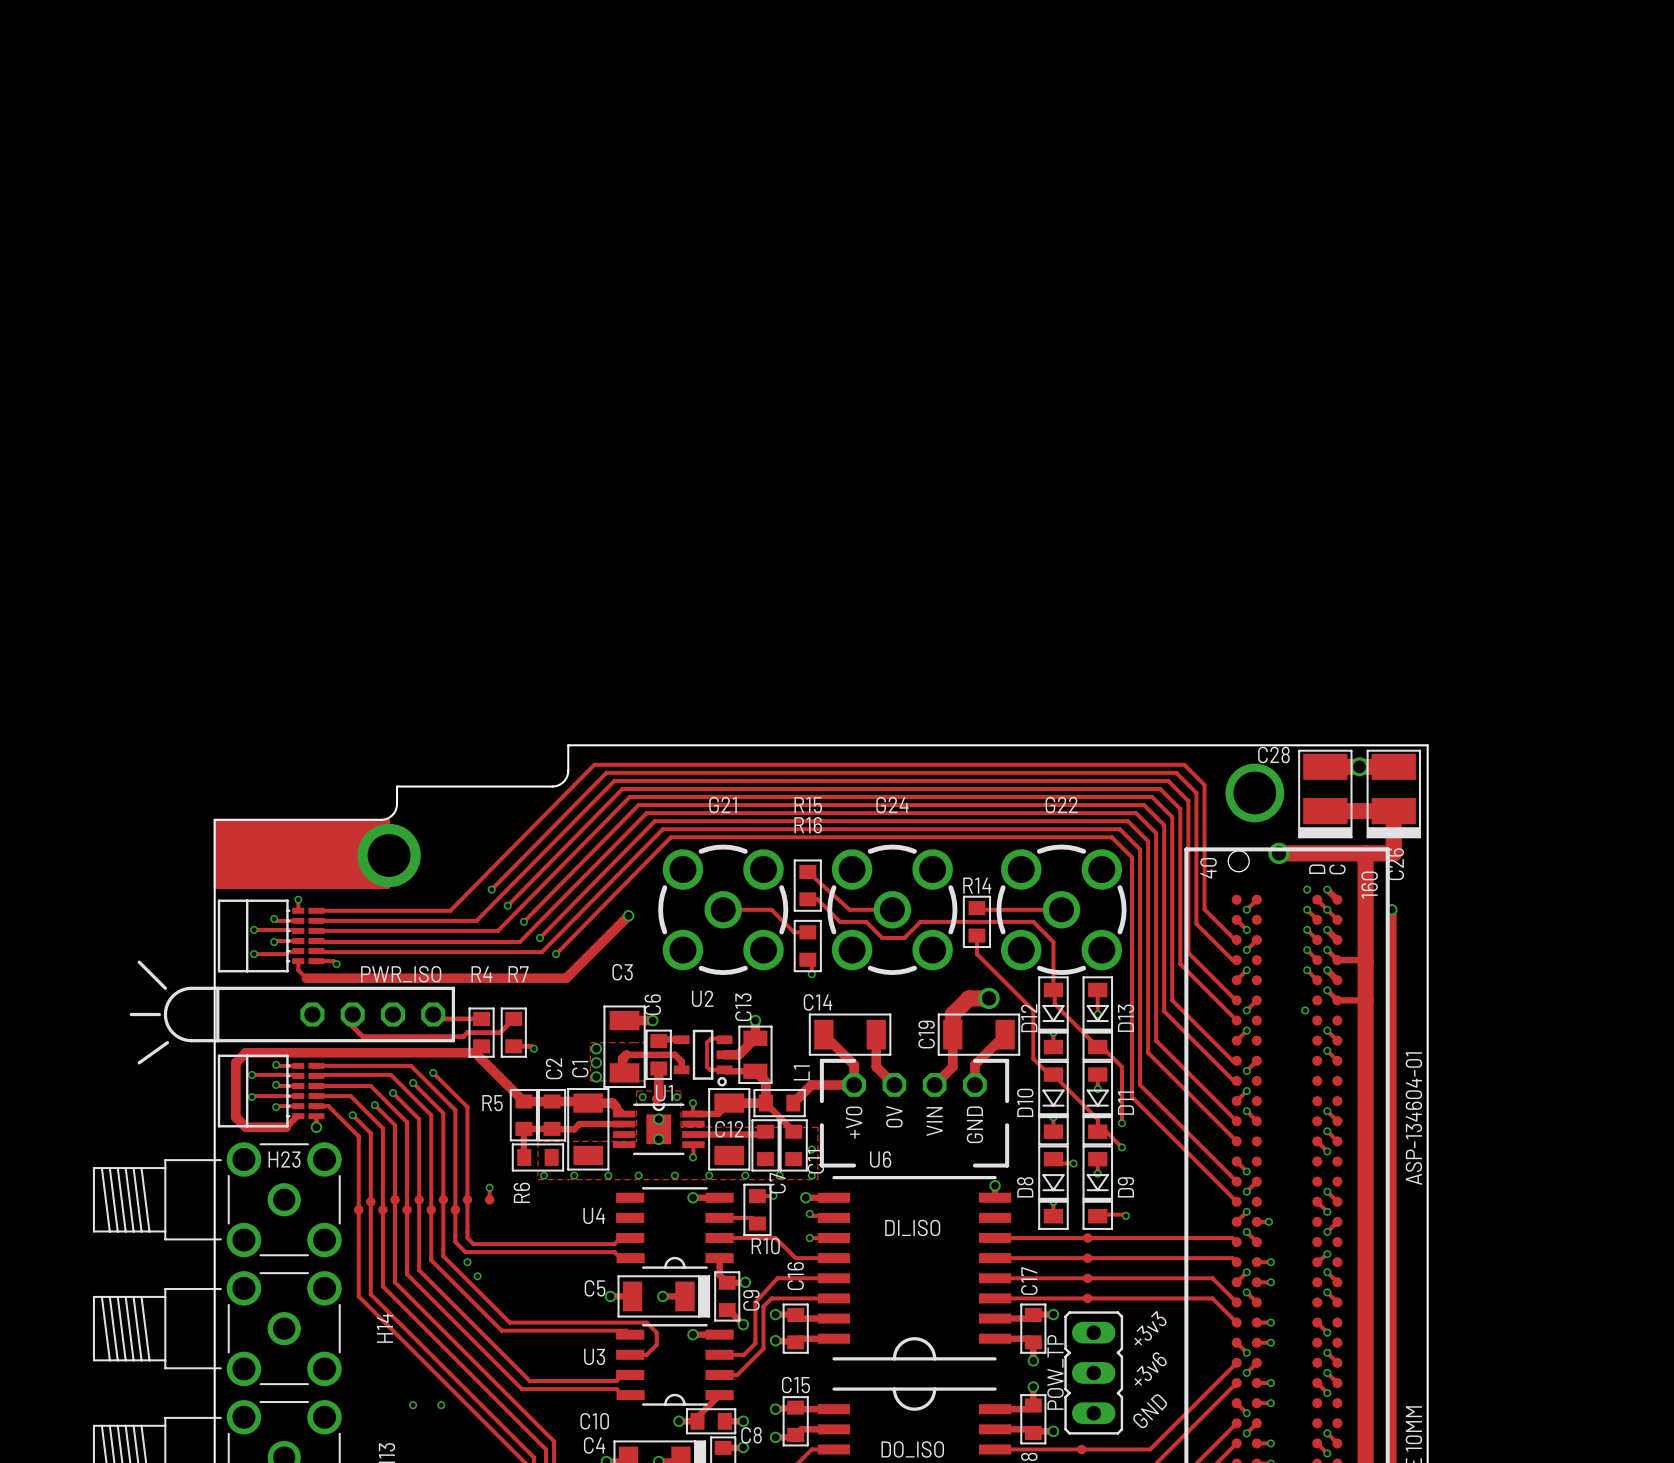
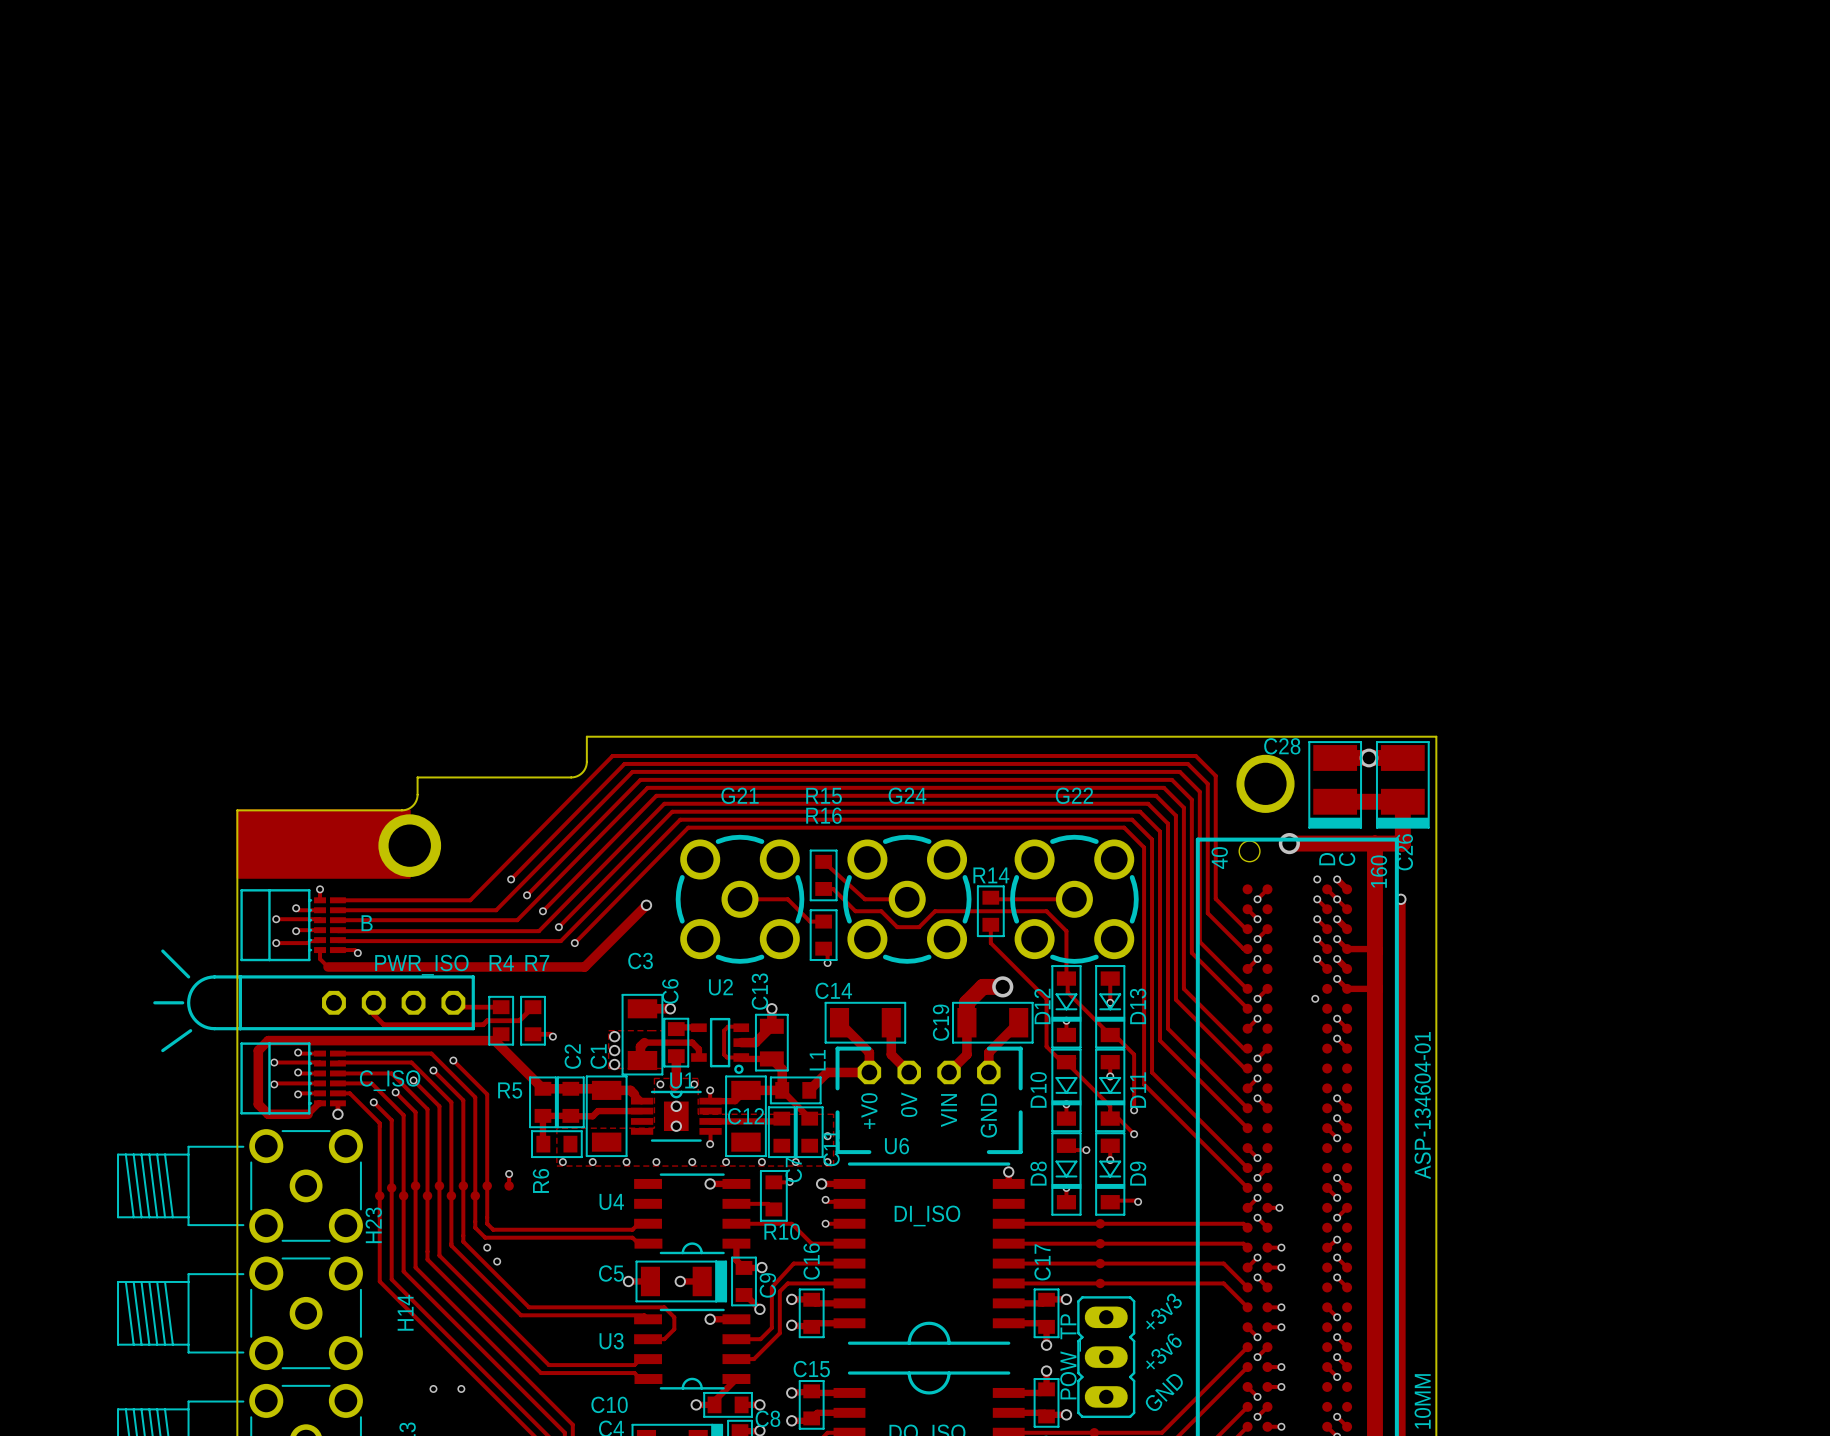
B name: none -> B (367, 923)
C_ISO name: none -> C_ISO (390, 1080)
H23 name rotation: 0° (284, 1159) -> 90° counterclockwise (373, 1225)
H23 name position: H23 (284, 1159) -> H23 (373, 1225)

